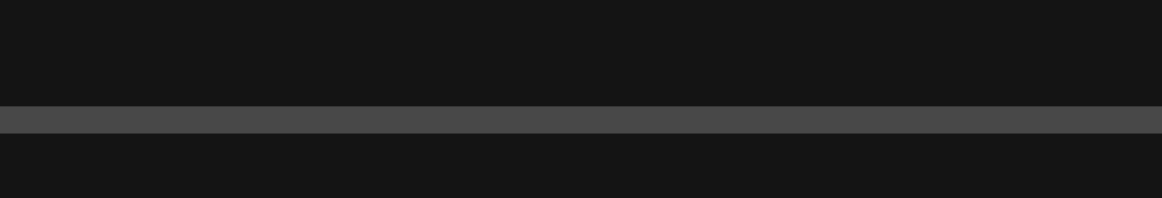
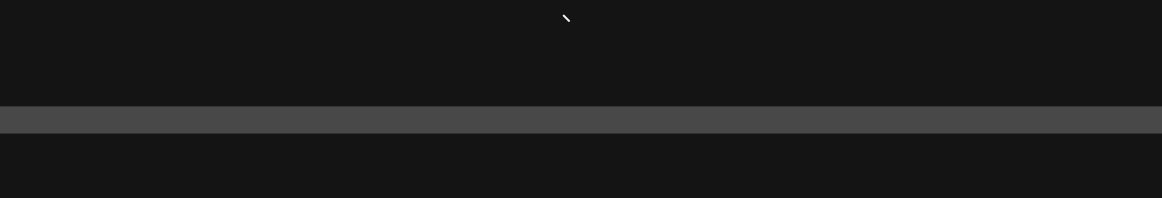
line: none -> (563, 15) (569, 20)

